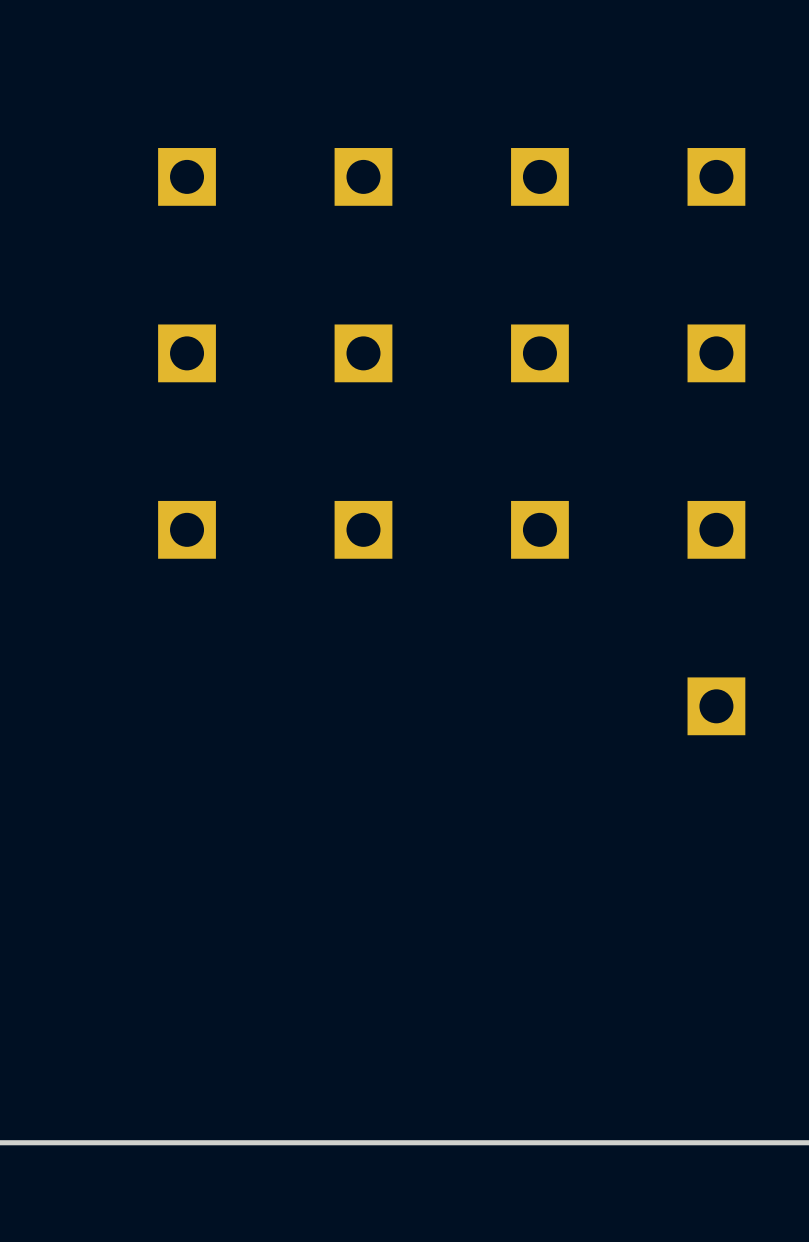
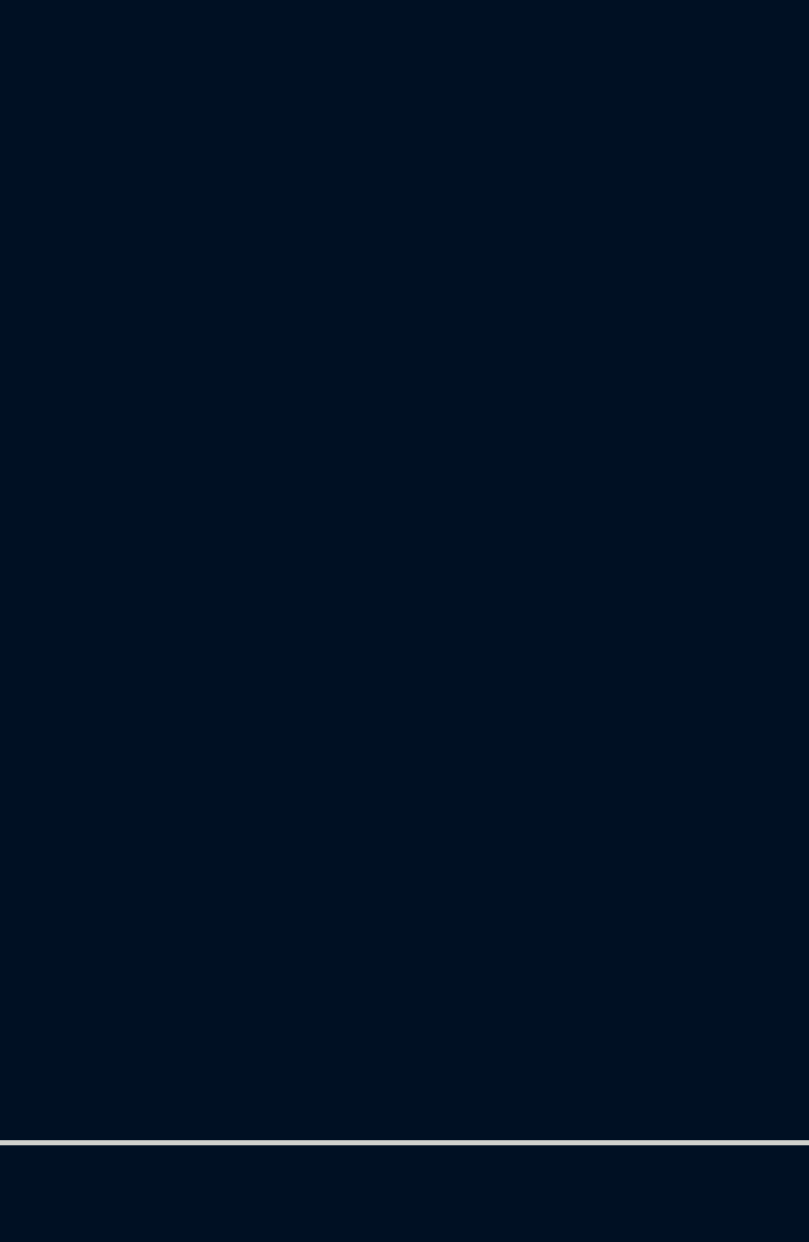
part: (187, 176) -> none
part: (363, 176) -> none
part: (539, 176) -> none
part: (716, 176) -> none
part: (187, 353) -> none
part: (363, 353) -> none
part: (539, 353) -> none
part: (716, 353) -> none
part: (187, 529) -> none
part: (363, 529) -> none
part: (539, 529) -> none
part: (716, 529) -> none
part: (716, 706) -> none

